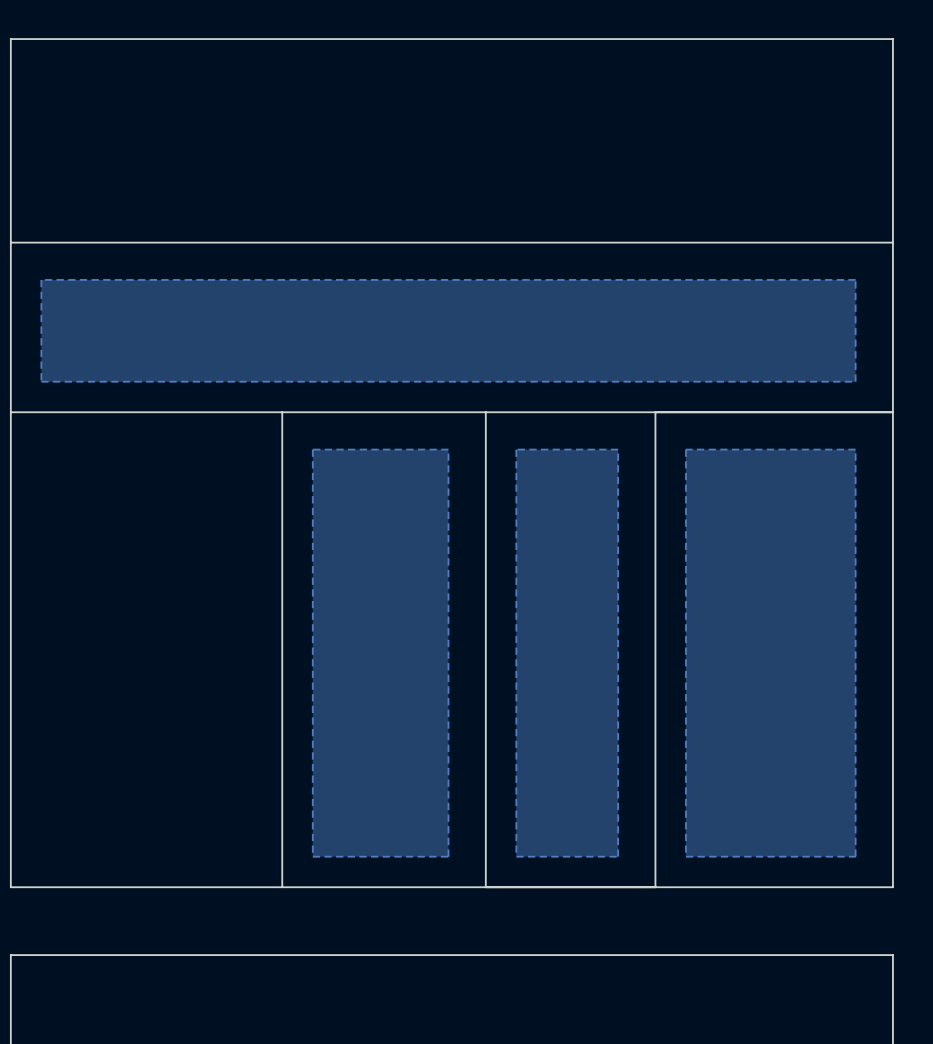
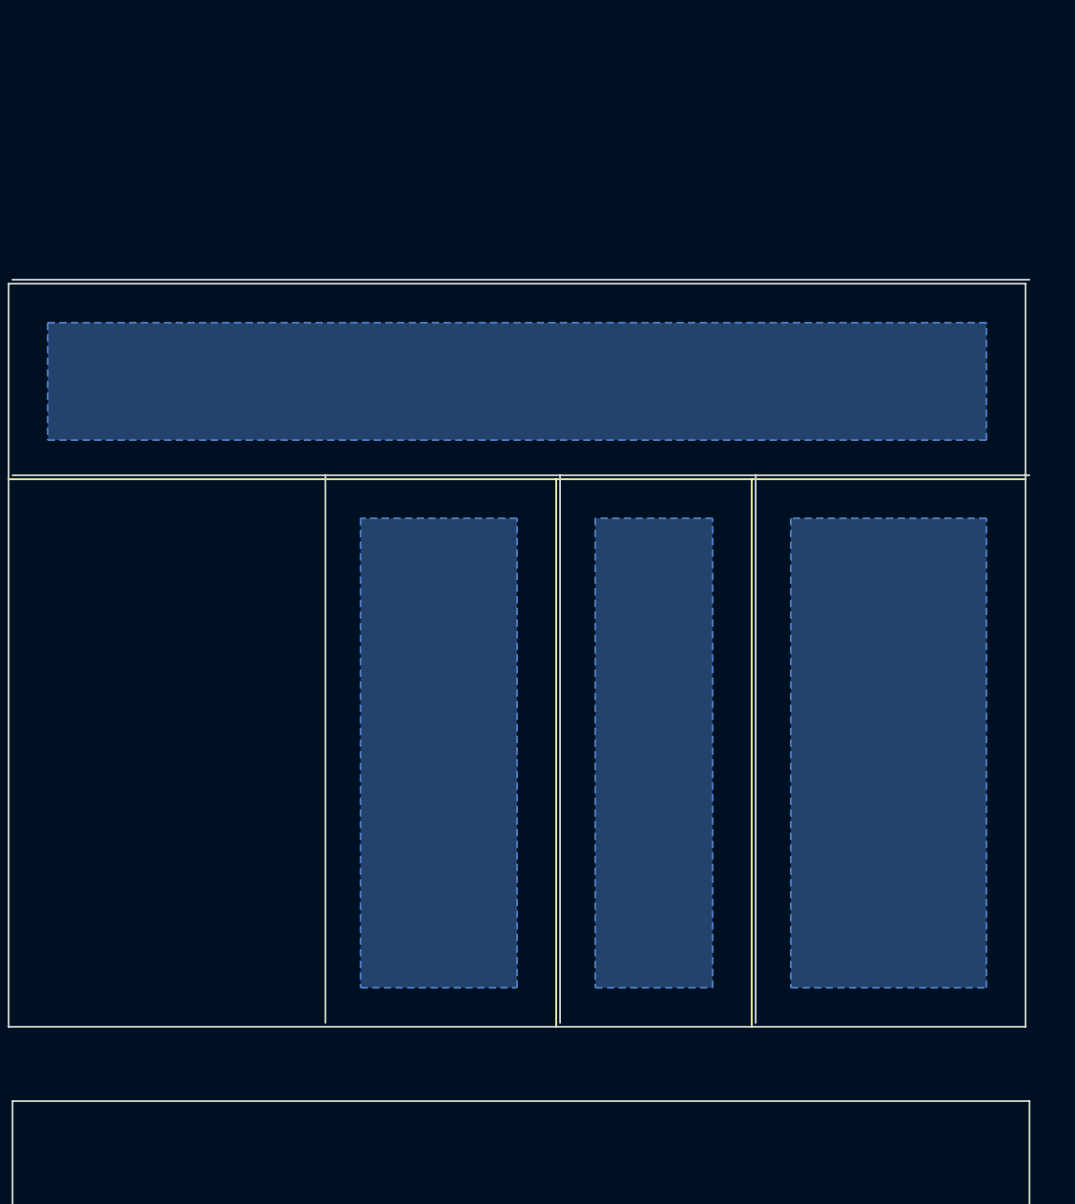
board edge: (892, 39) (892, 887) (10, 887) (10, 39) (892, 39) -> (1025, 283) (1025, 1026) (8, 1026) (8, 283) (1025, 283)
line: none -> (556, 479) (556, 1026)
line: none -> (751, 479) (751, 1026)
line: none -> (1025, 479) (8, 479)

